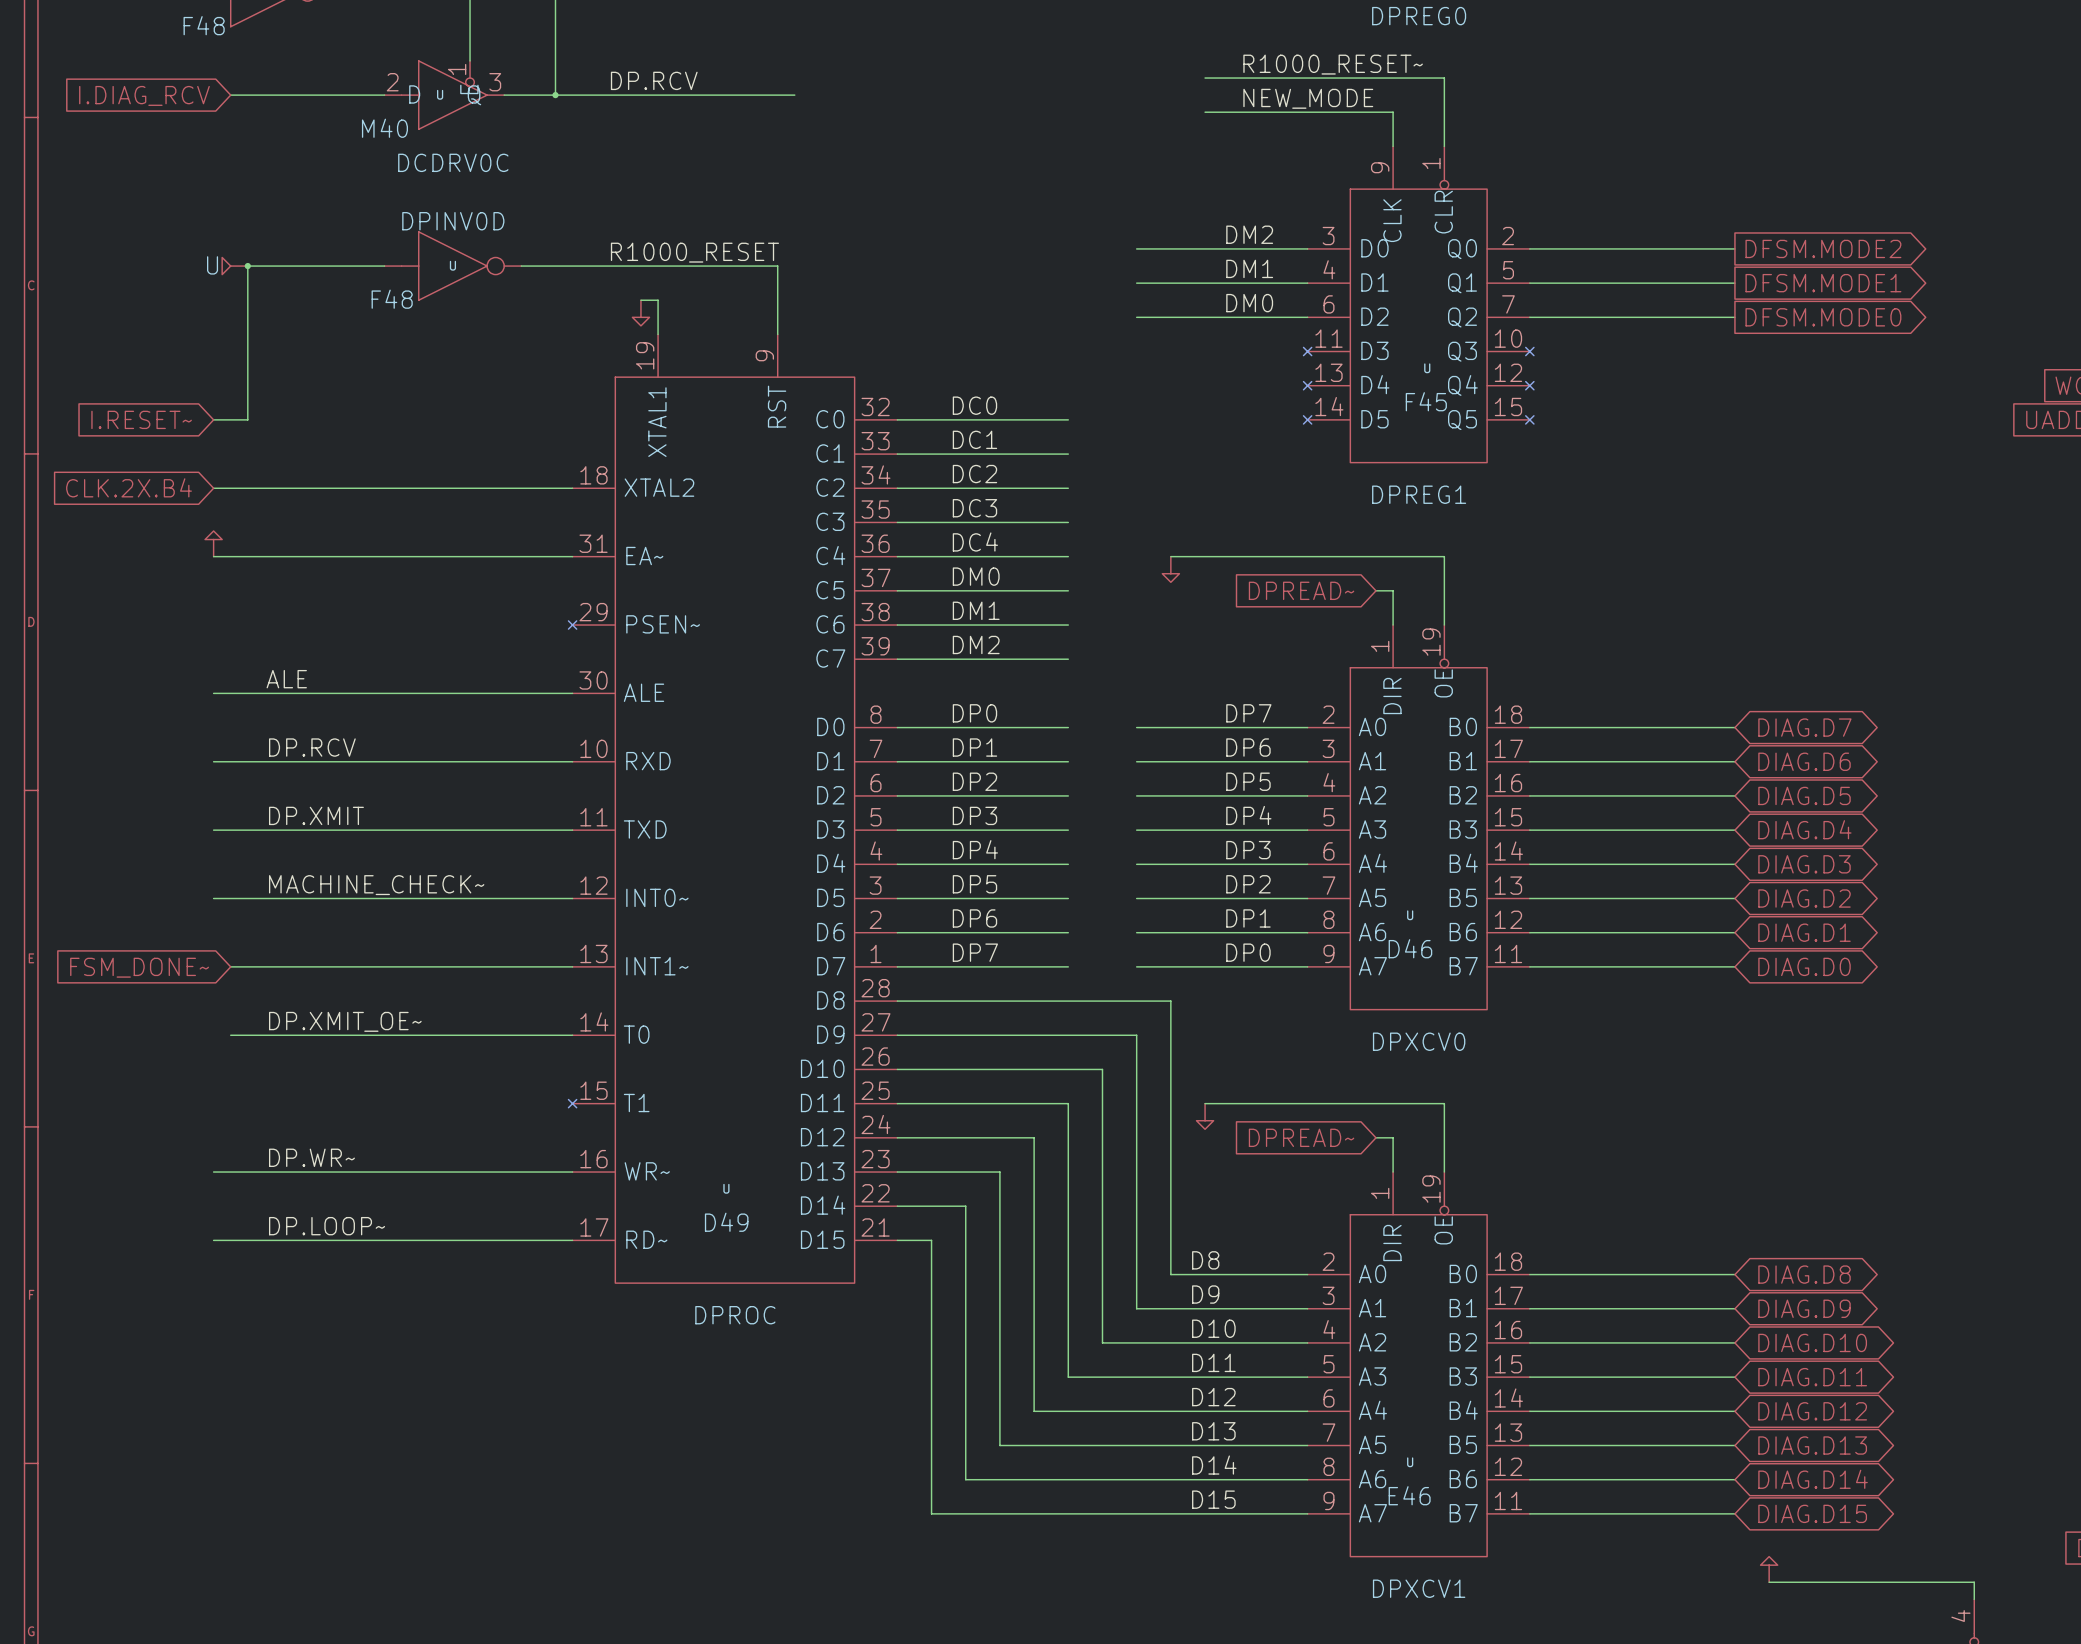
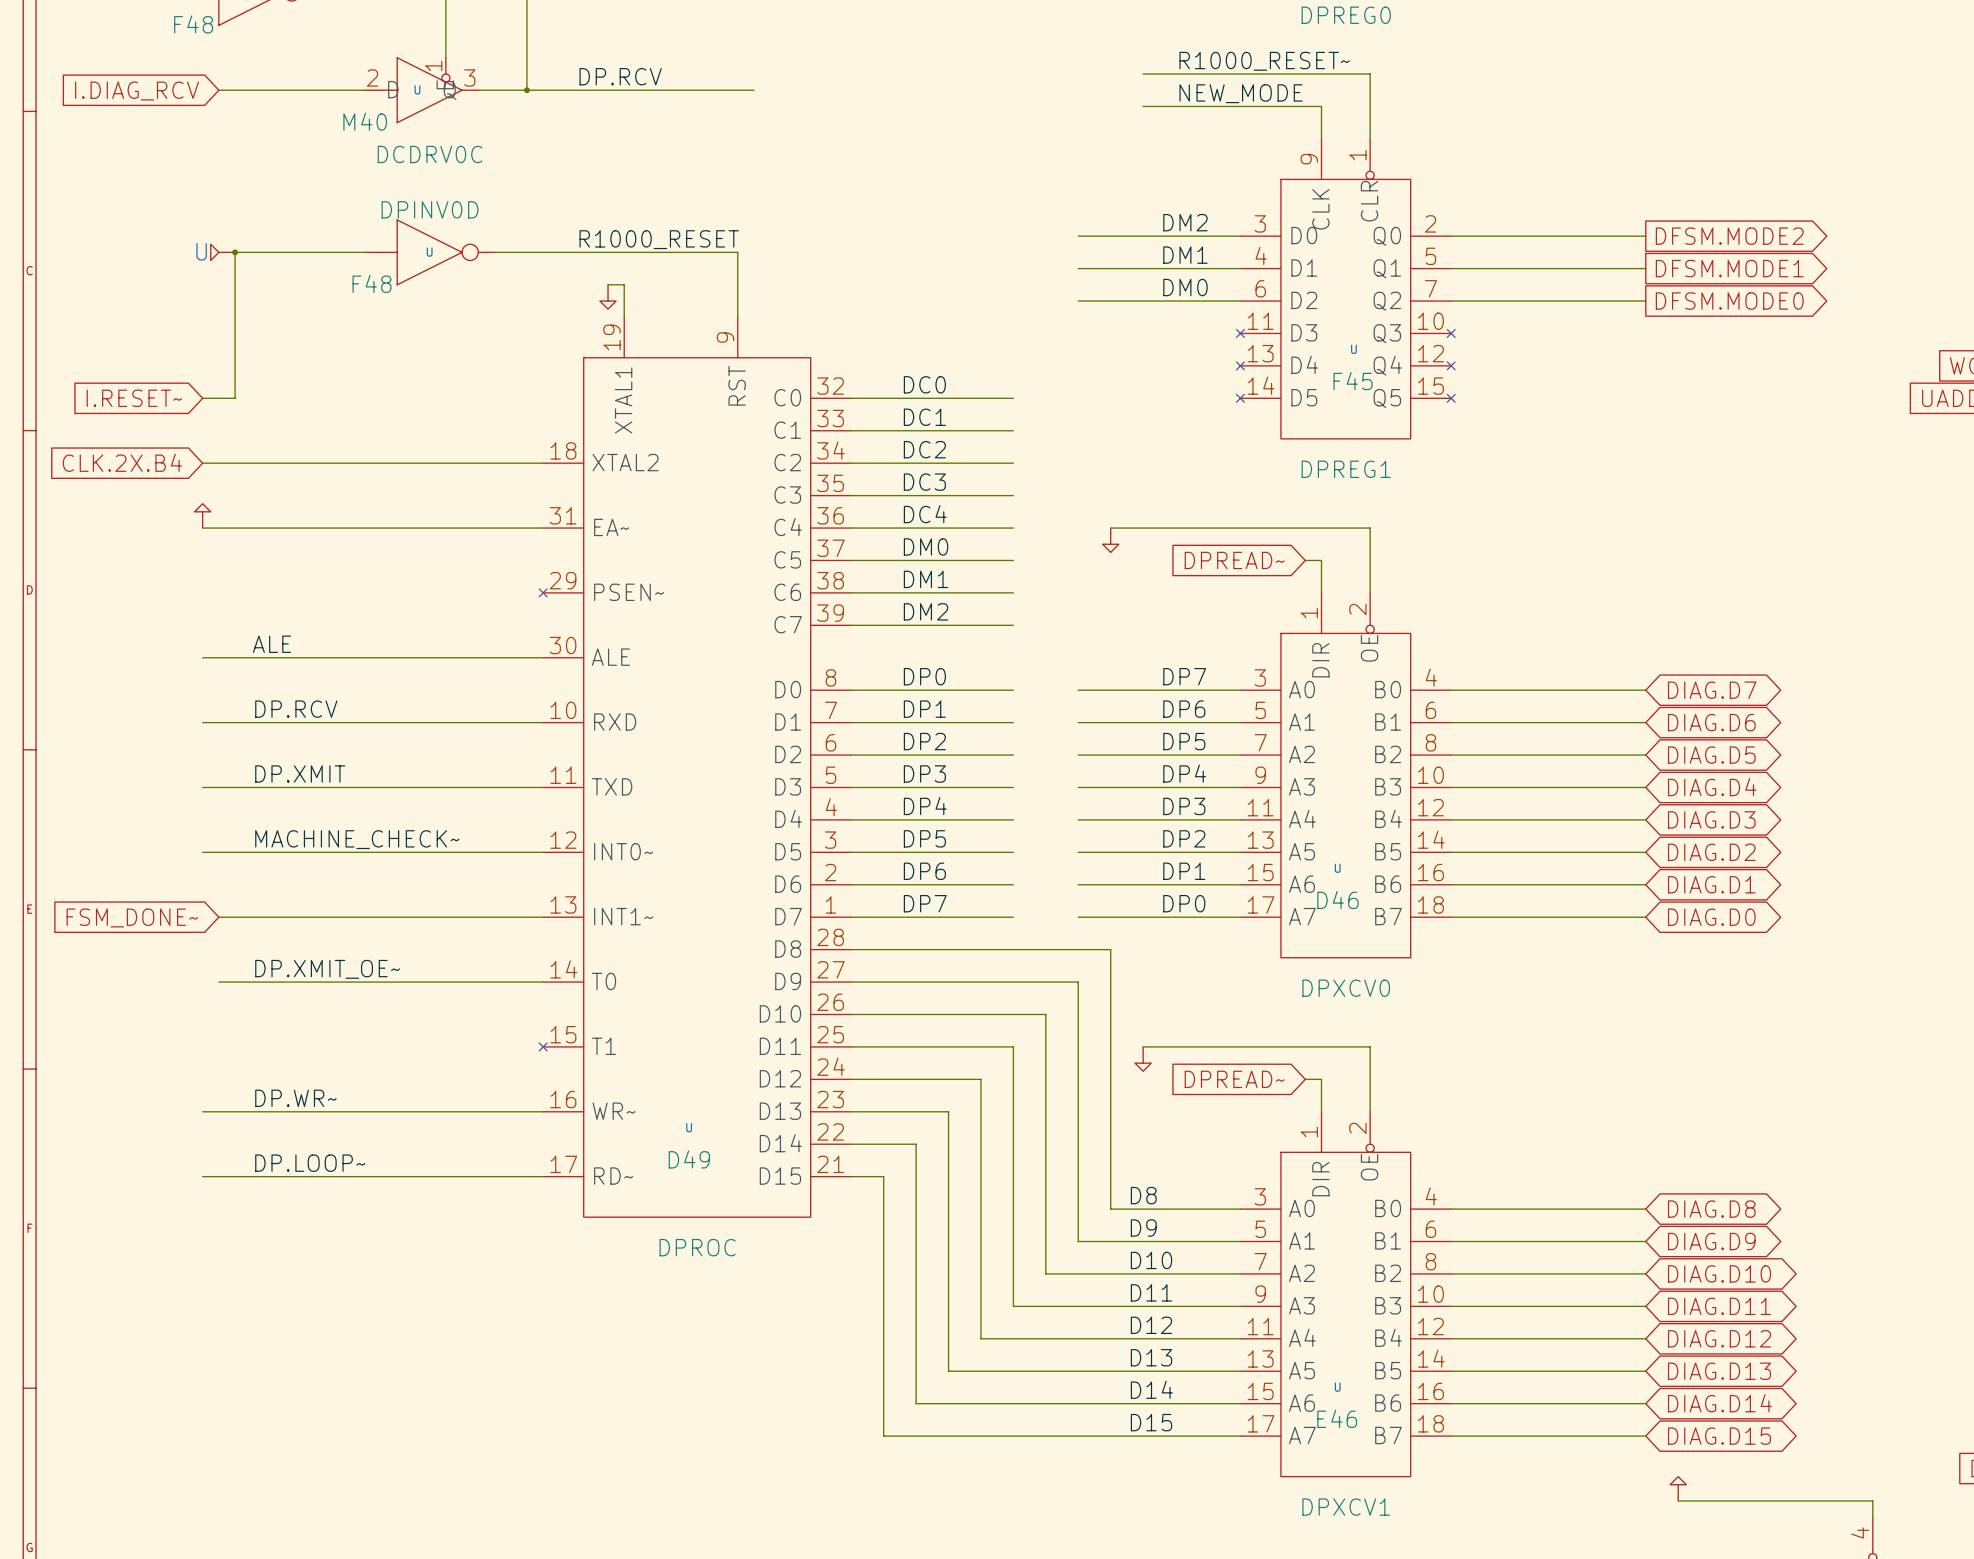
U symbol: [1307, 625, 1530, 1010] -> [1240, 592, 1452, 958]
U symbol: [1307, 1172, 1530, 1557] -> [1240, 1111, 1452, 1477]

